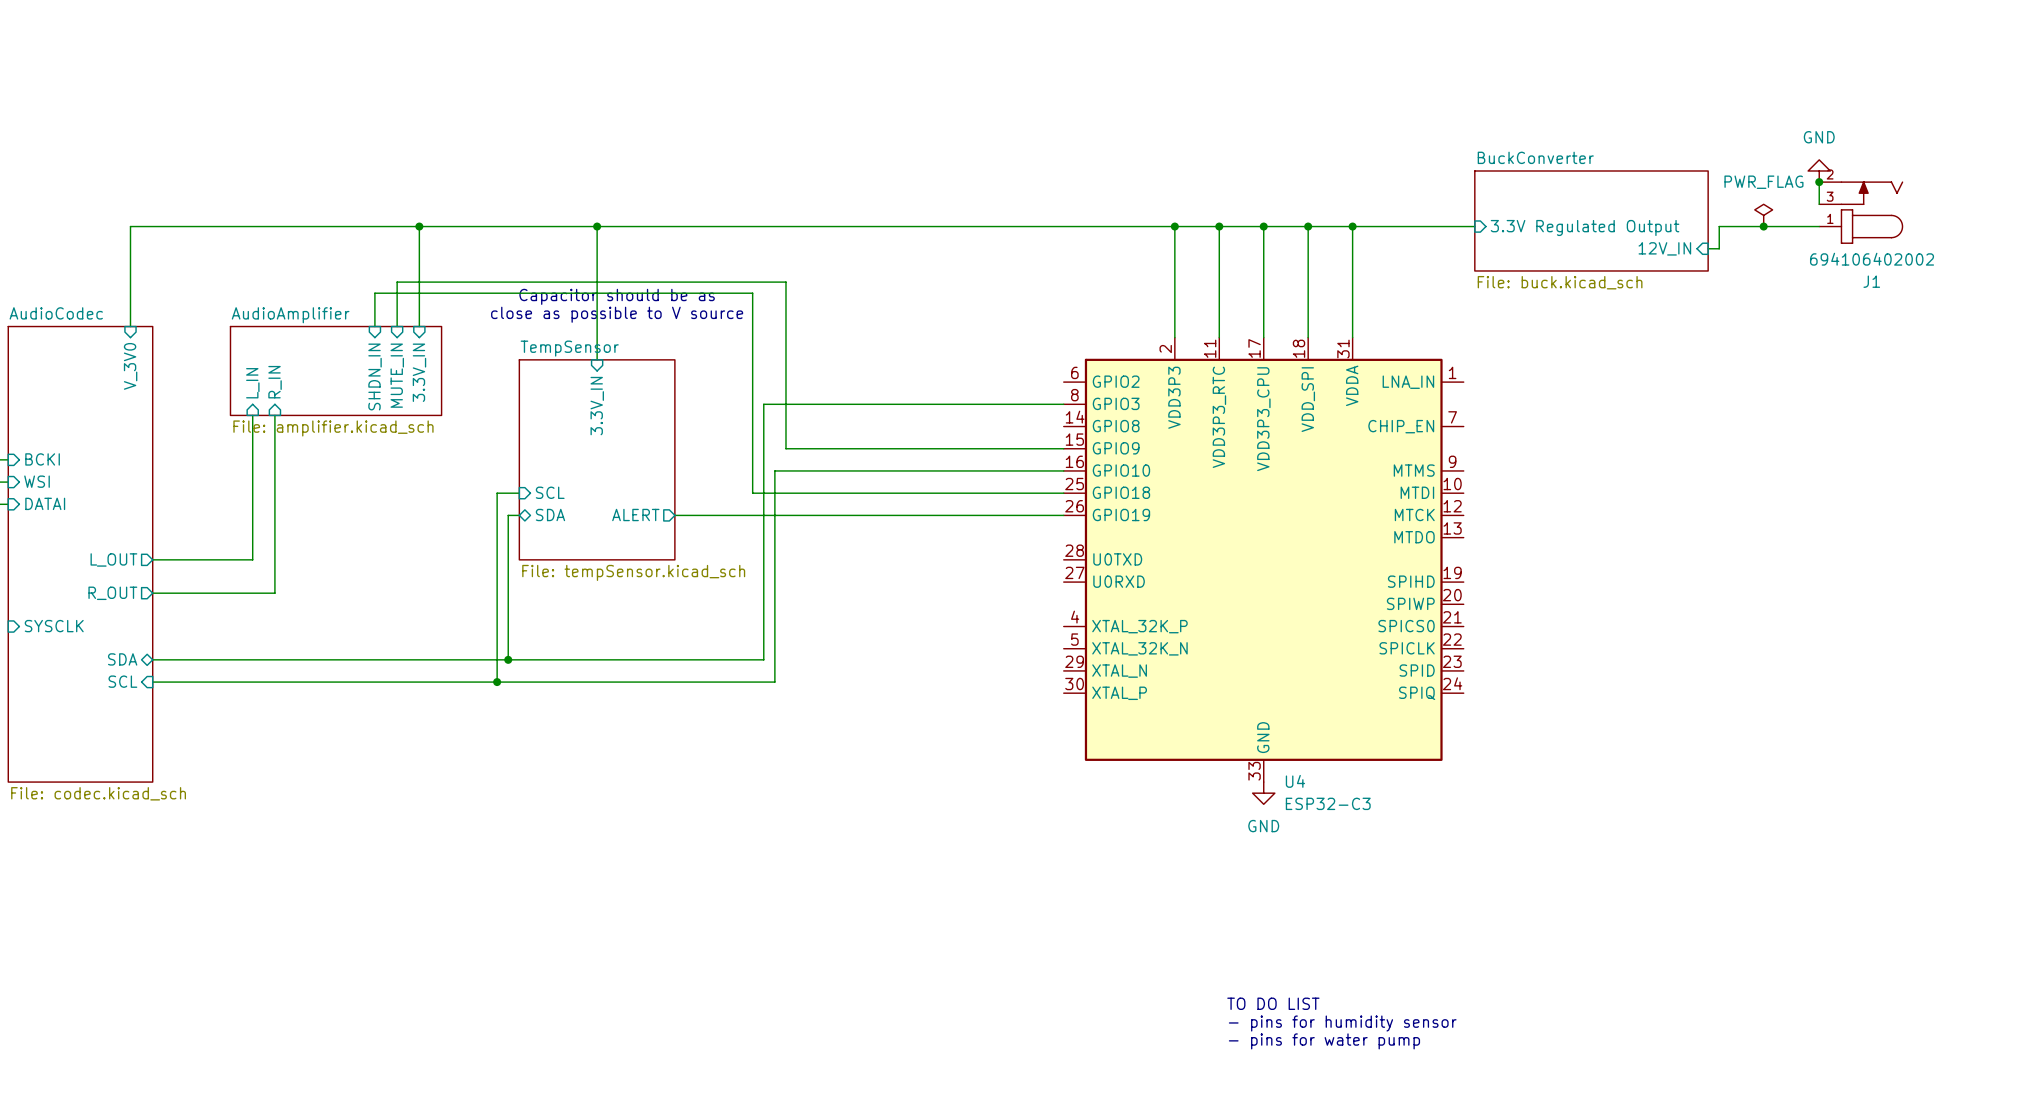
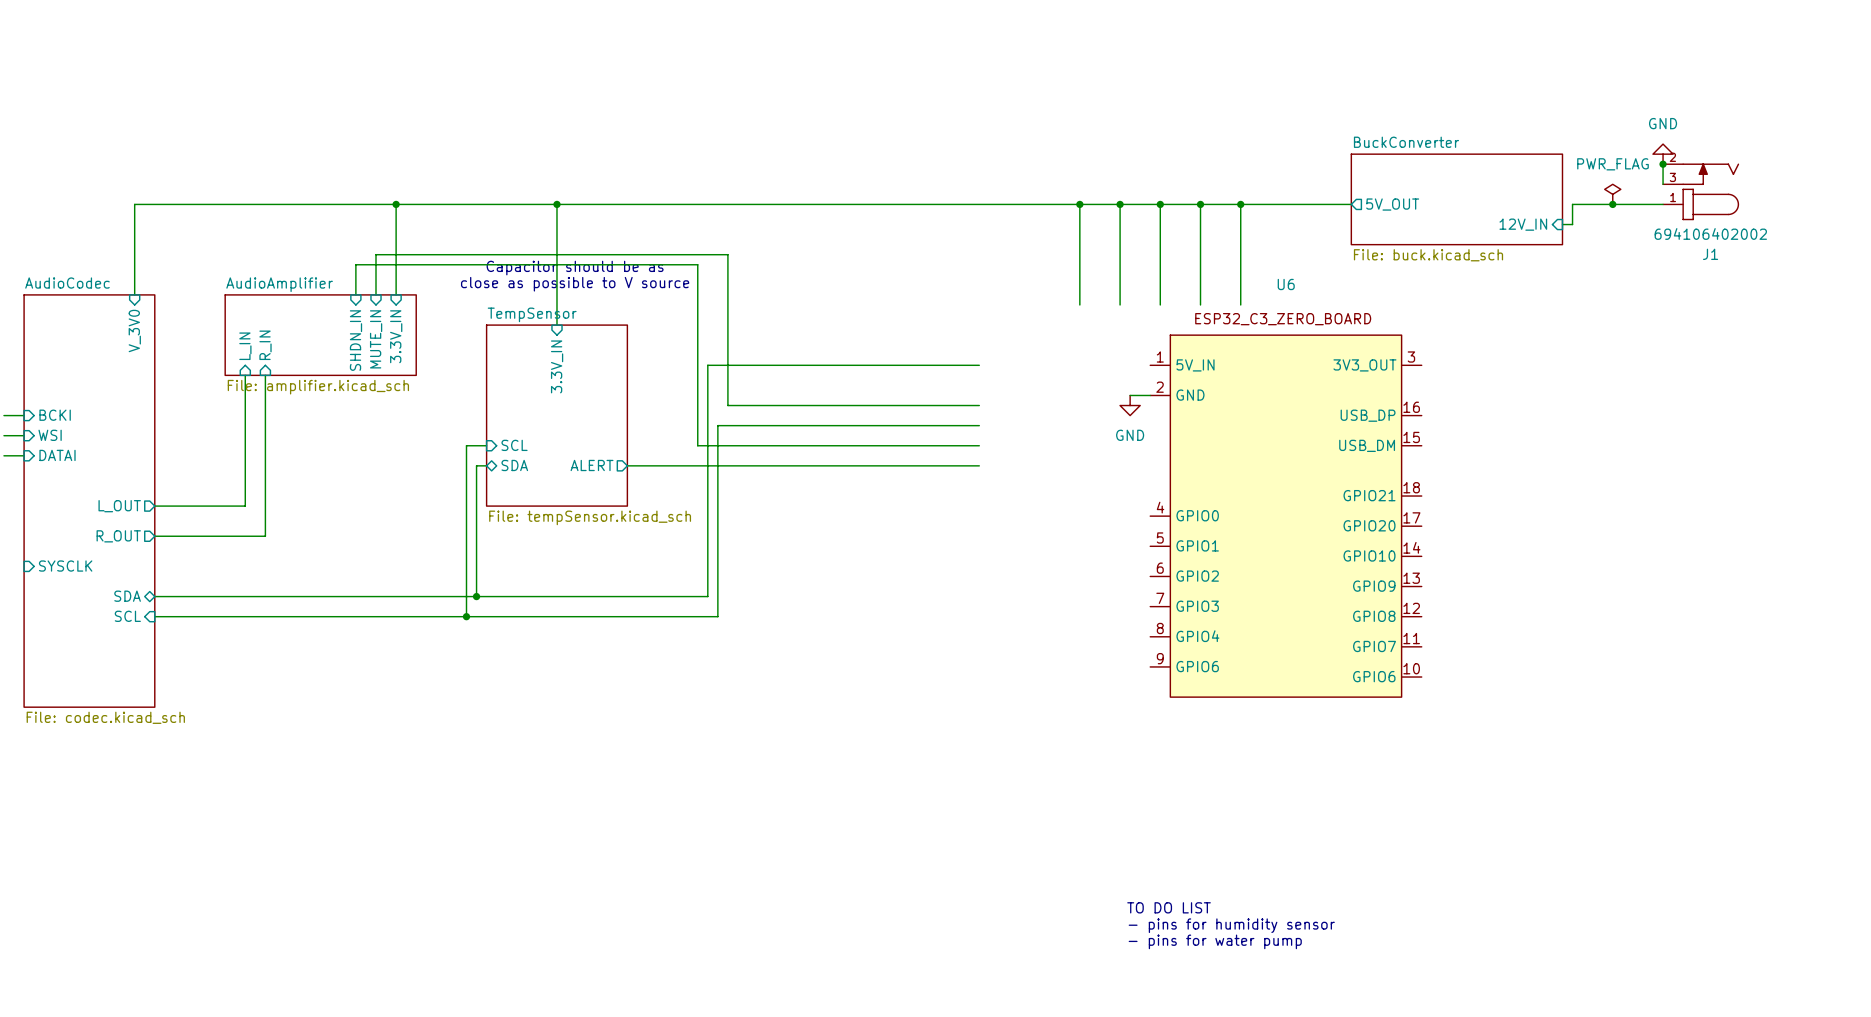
sheet pin shape: input (1585, 227) -> output (1392, 204)
sheet pin: 3.3V Regulated Output (1585, 227) -> 5V_OUT (1392, 204)
power symbol: none -> GND (1130, 405)
U4: ESP32-C3 (1263, 559) -> none
U6: none -> (1285, 516)
power symbol: GND (1263, 793) -> none

